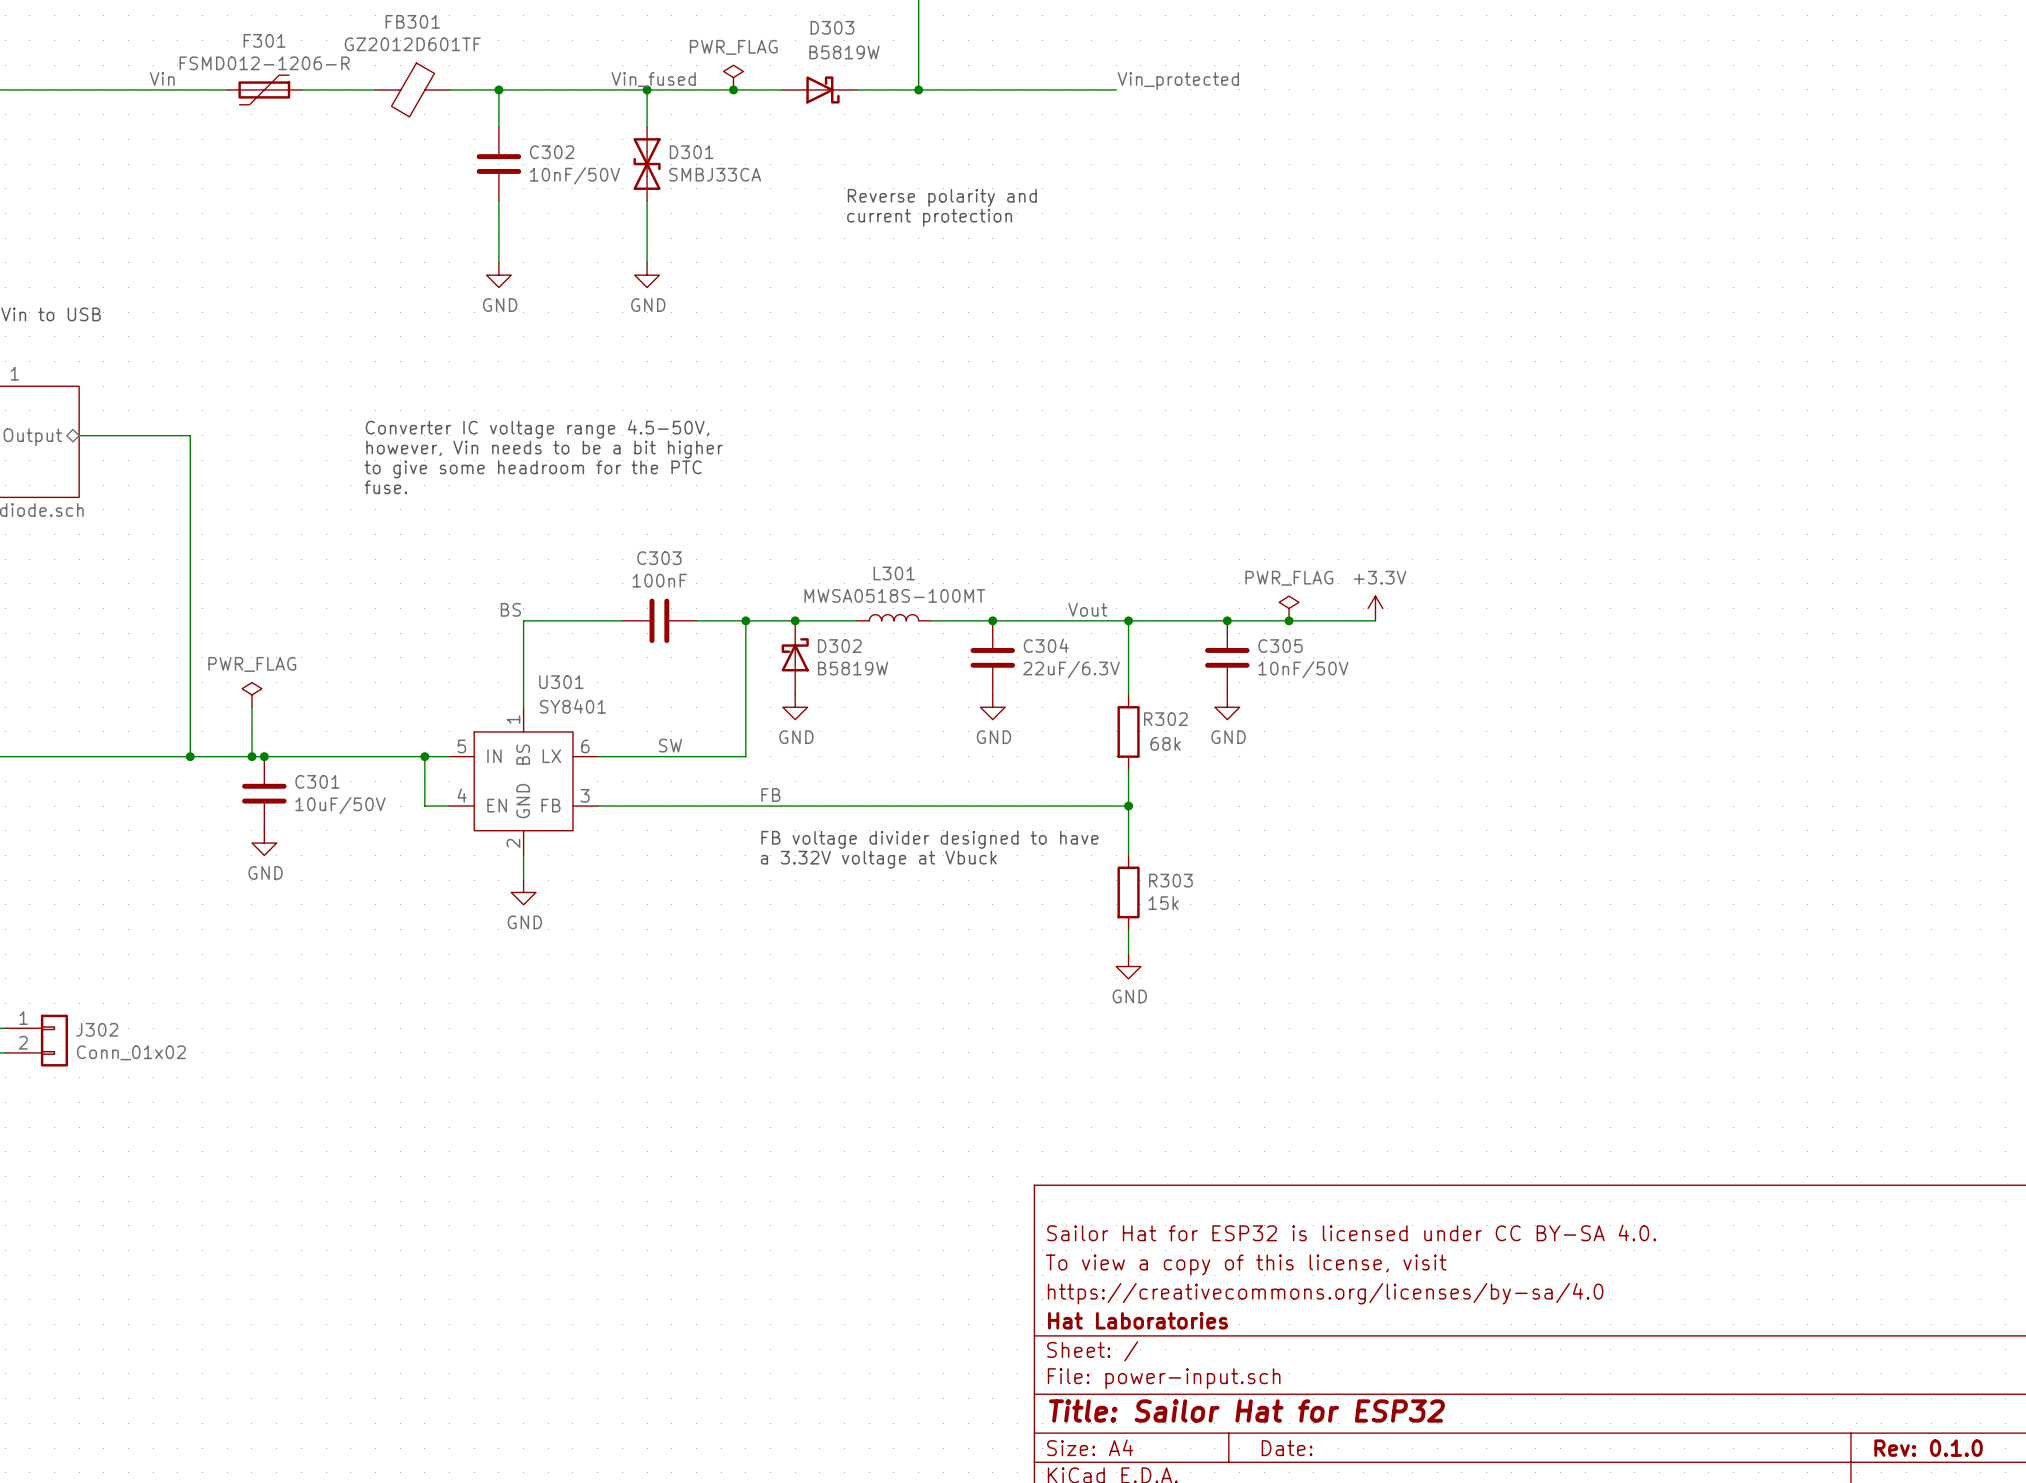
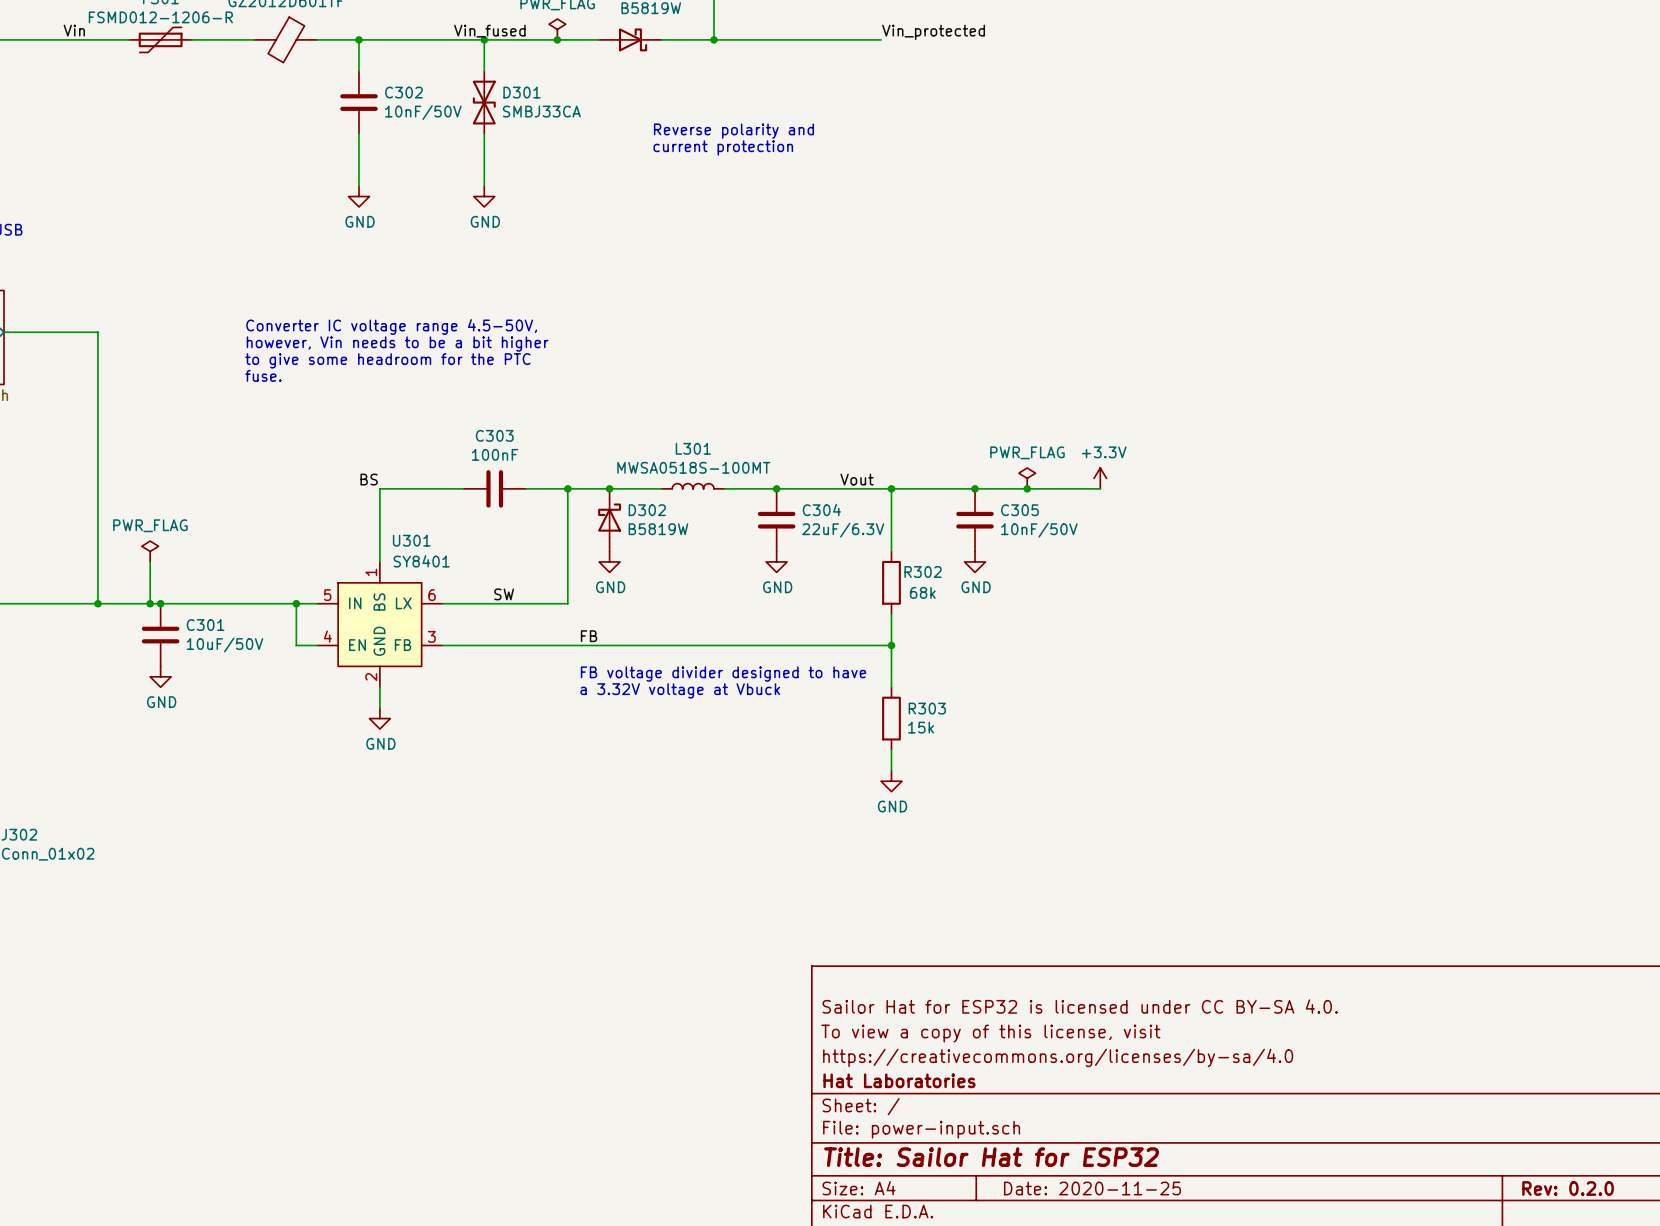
title block: Date: (1287, 1448) -> Date: 2020-11-25 (1092, 1188)
title block: Rev: 0.1.0 (1928, 1448) -> Rev: 0.2.0 (1568, 1188)

